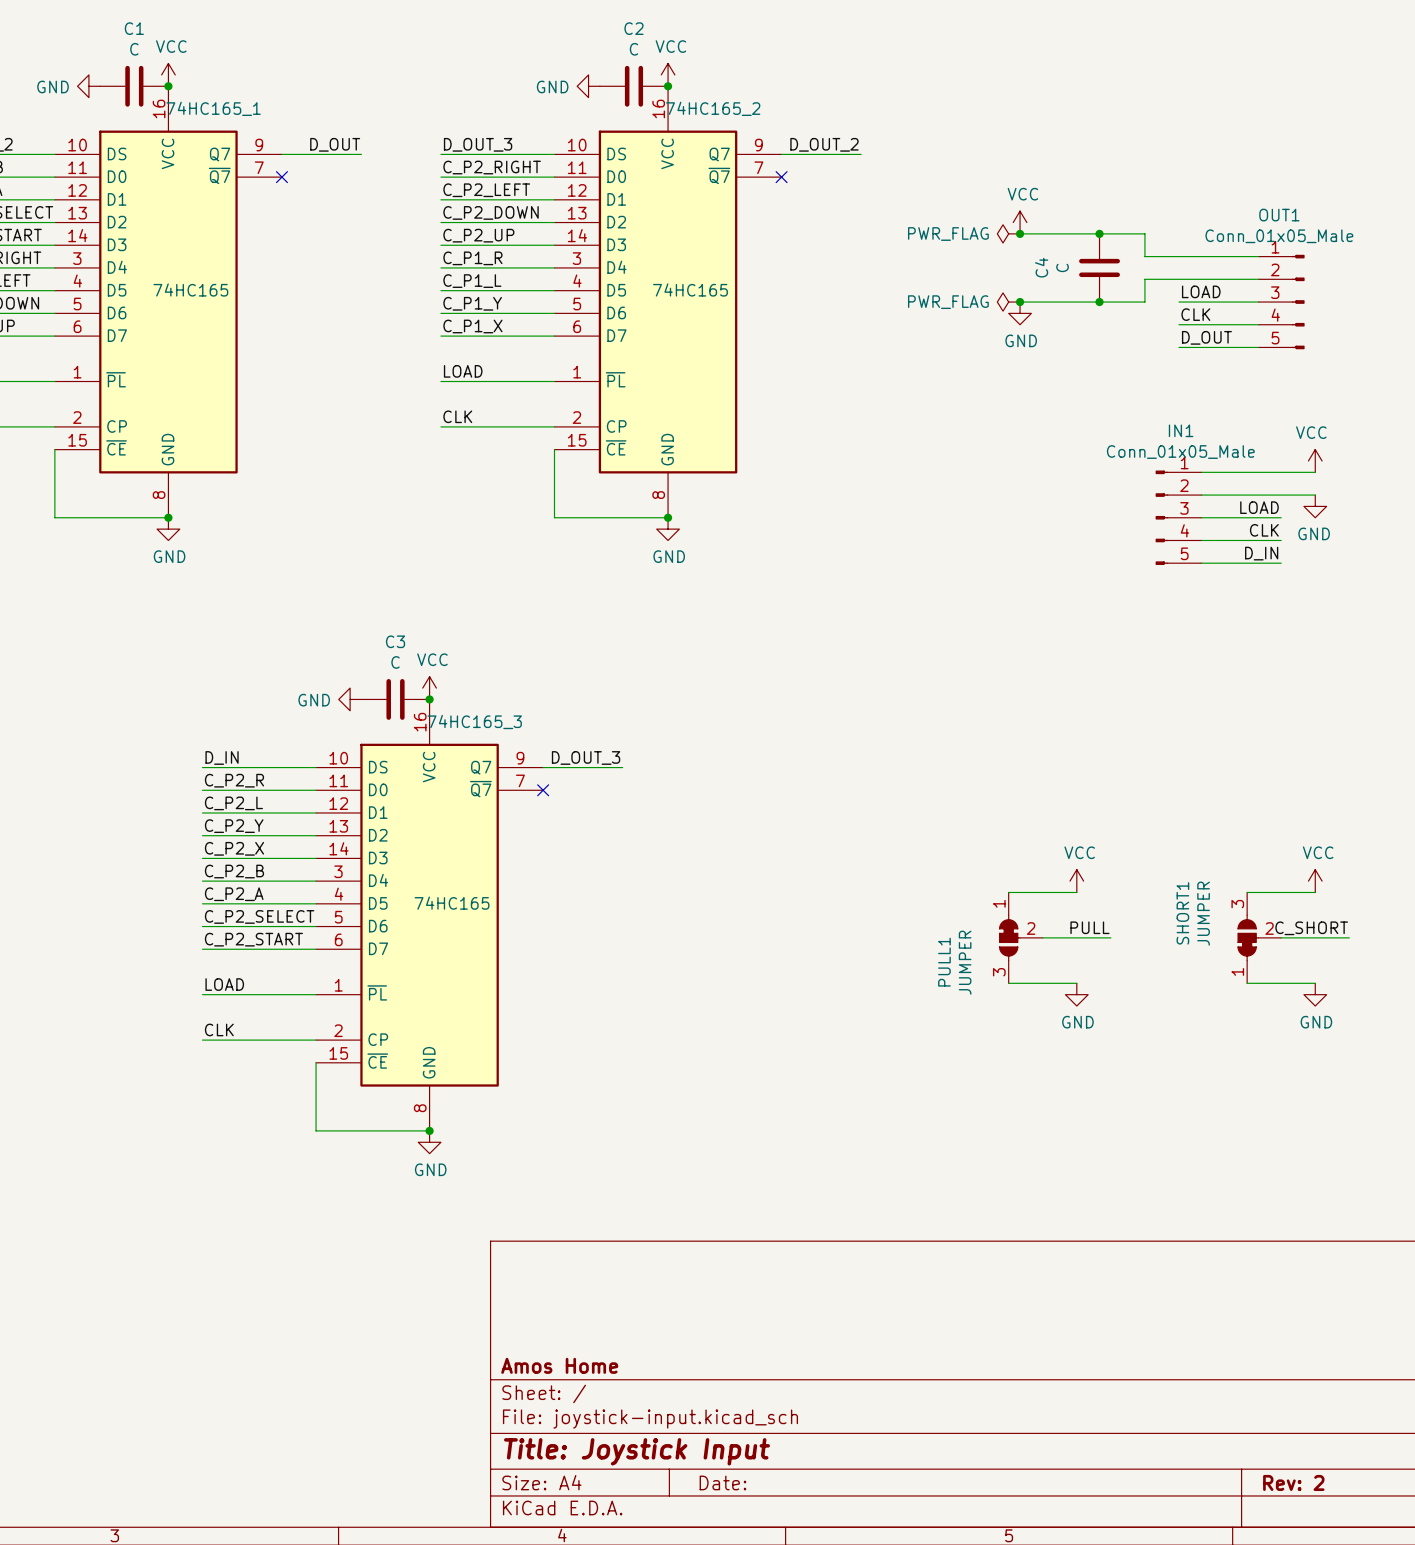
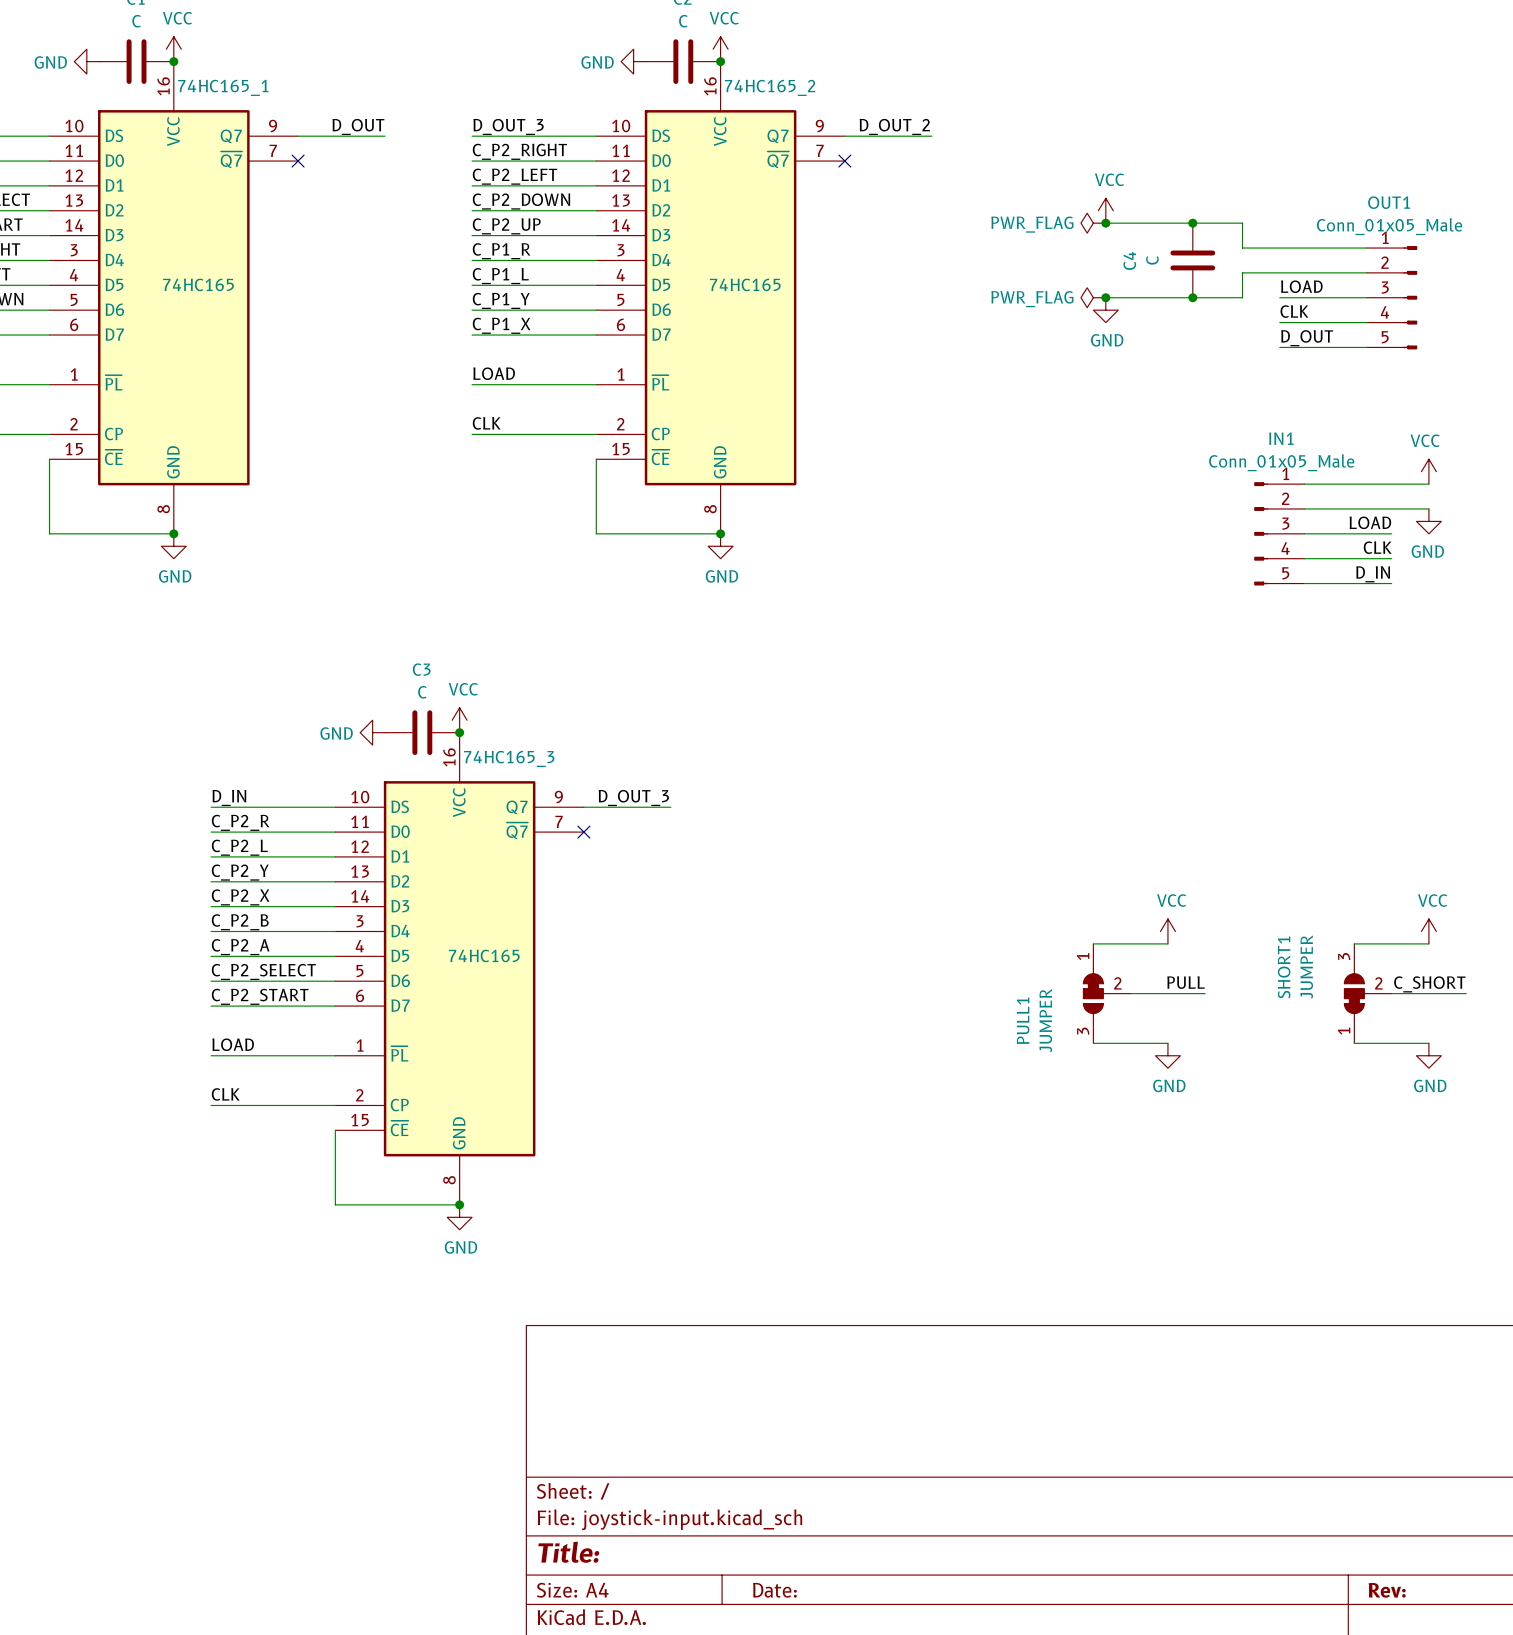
title block: Amos Home (559, 1365) -> none
title block: Title: Joystick Input (636, 1451) -> Title: (568, 1552)
title block: Rev: 2 (1293, 1482) -> Rev: (1387, 1590)

